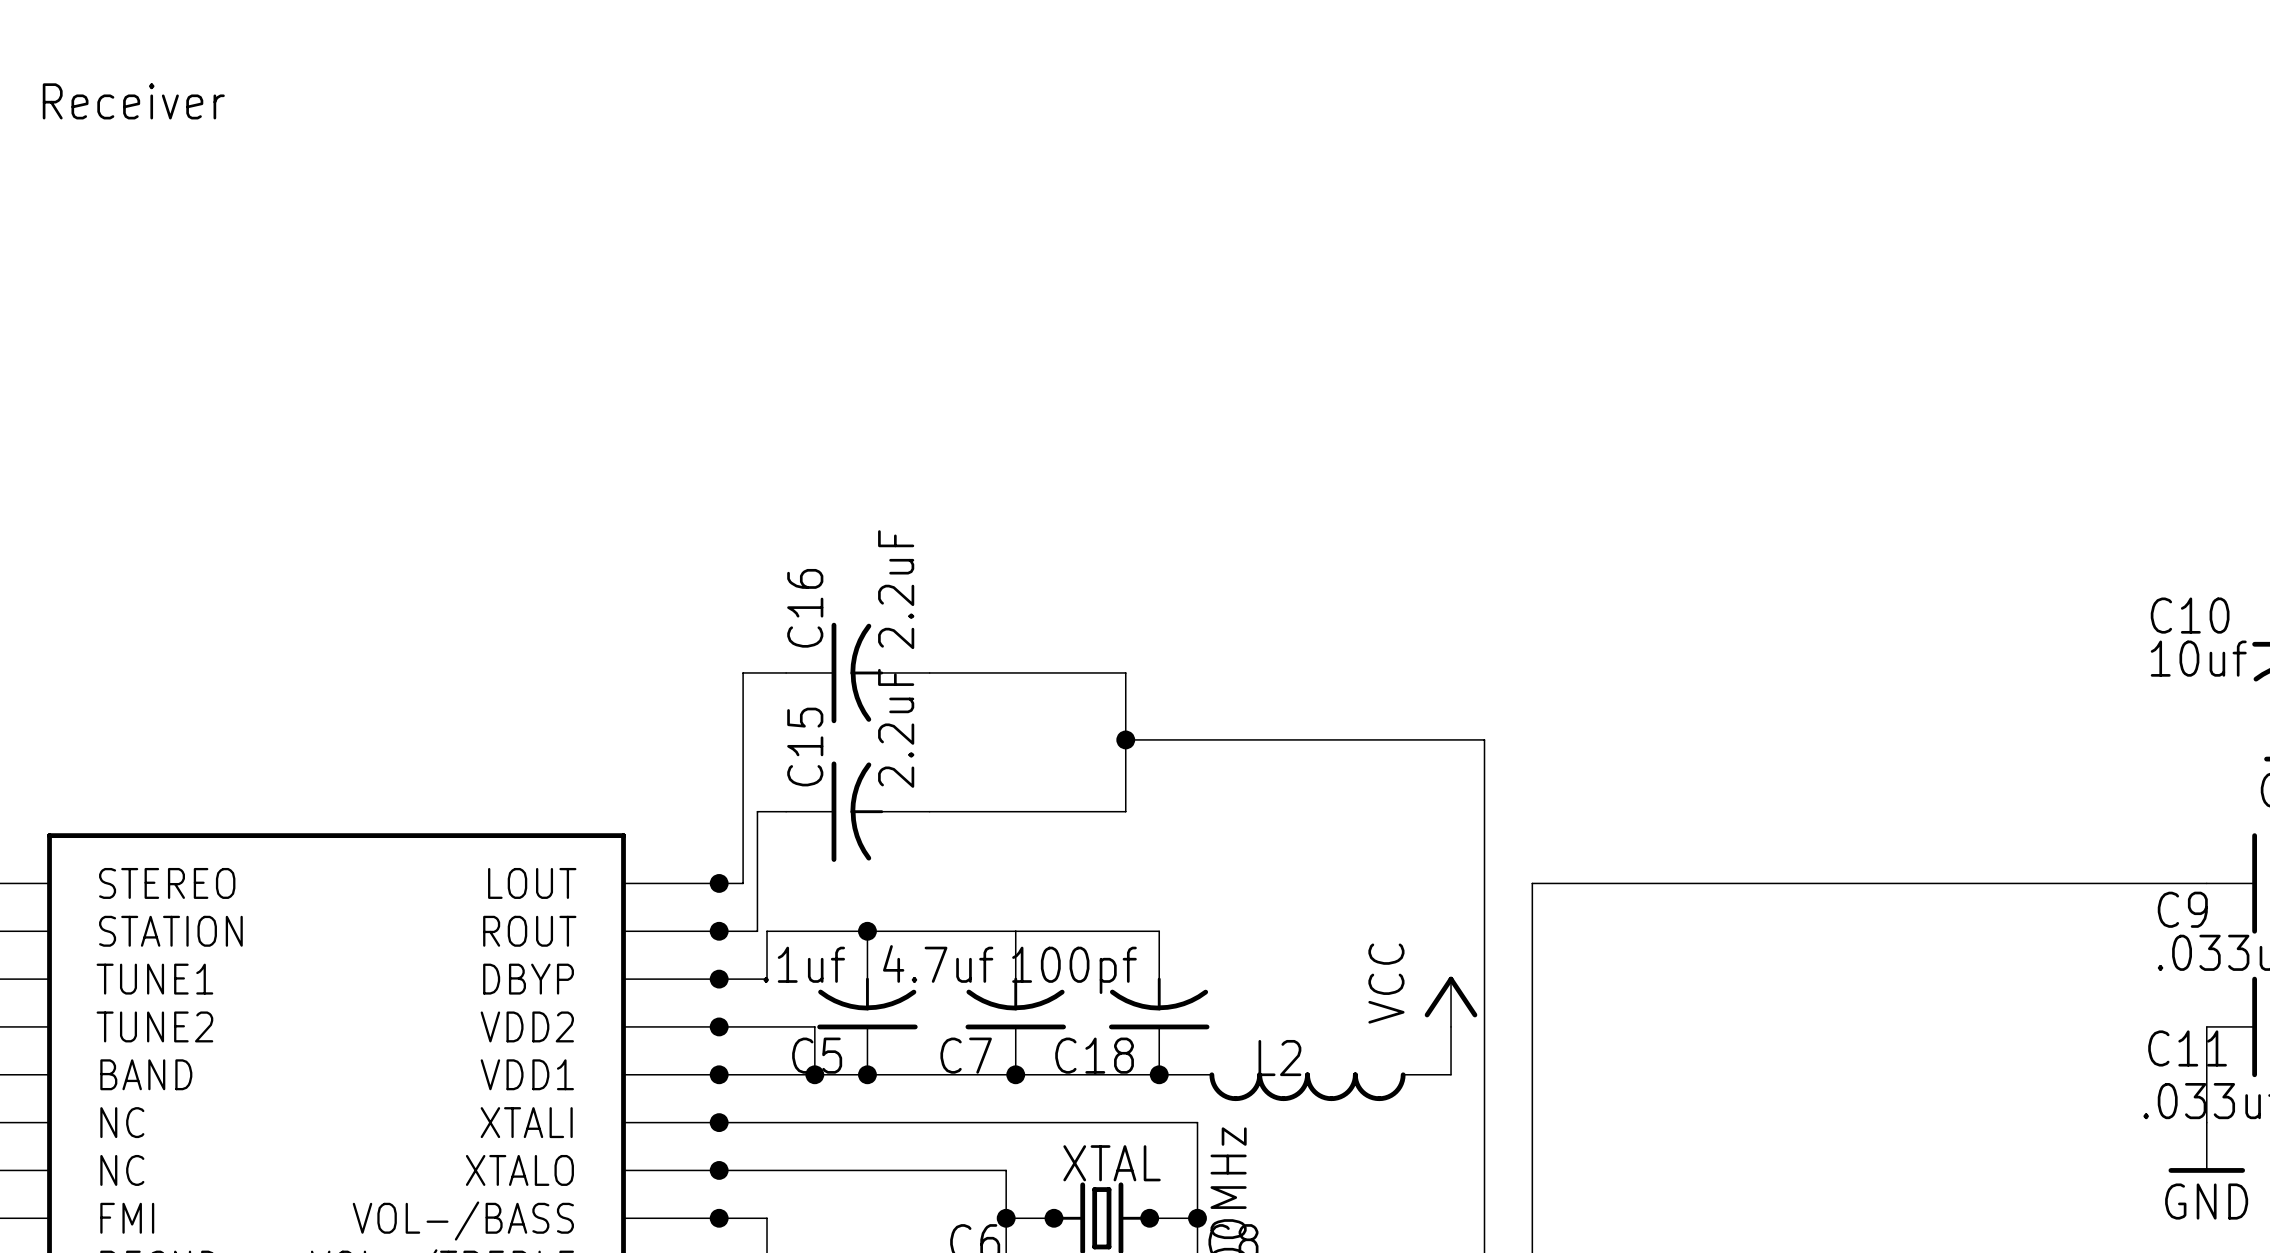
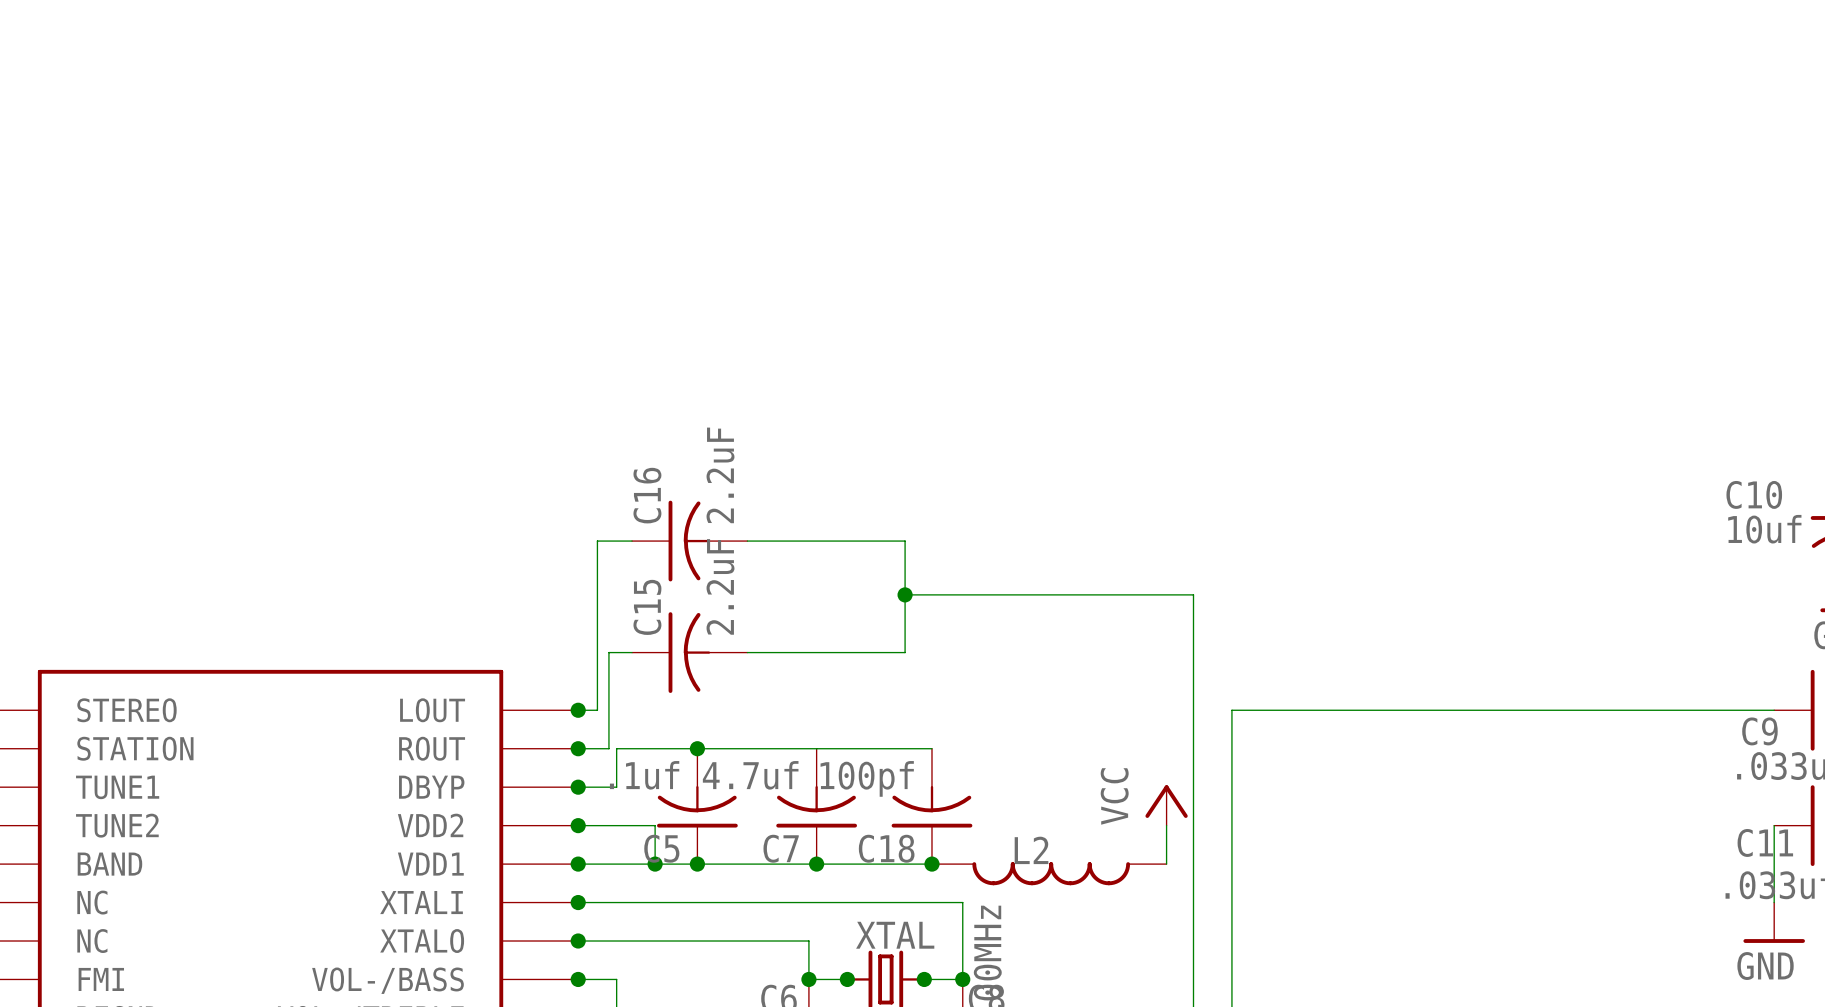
text: Receiver (133, 101) -> none

